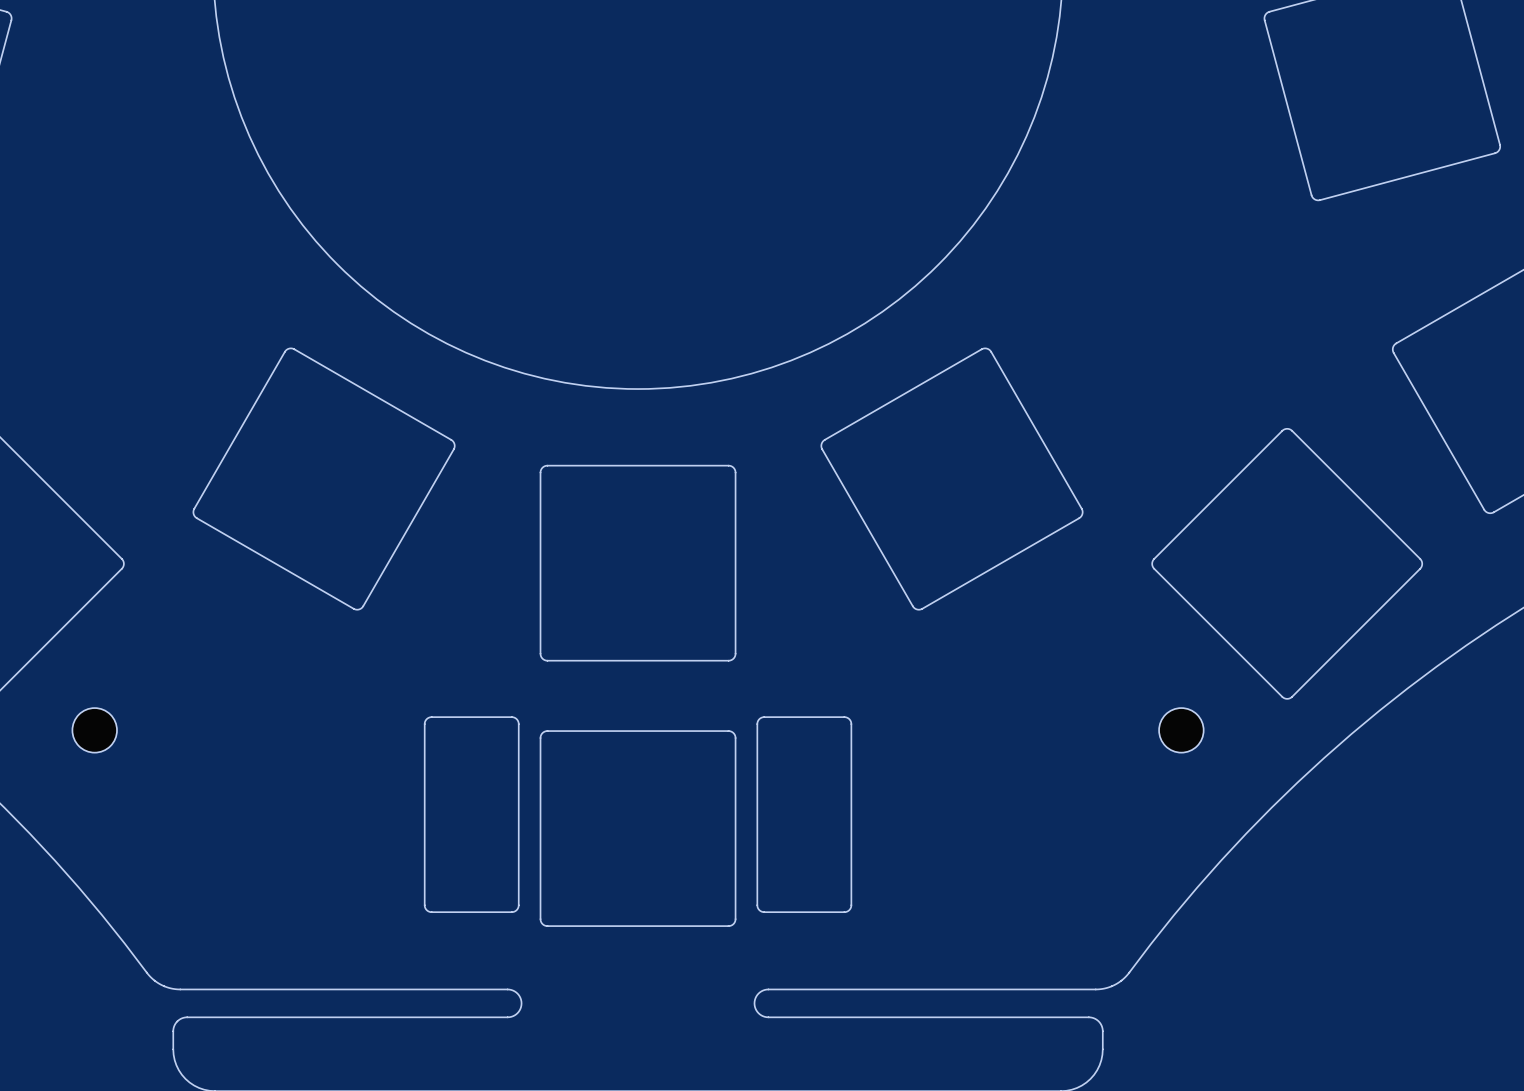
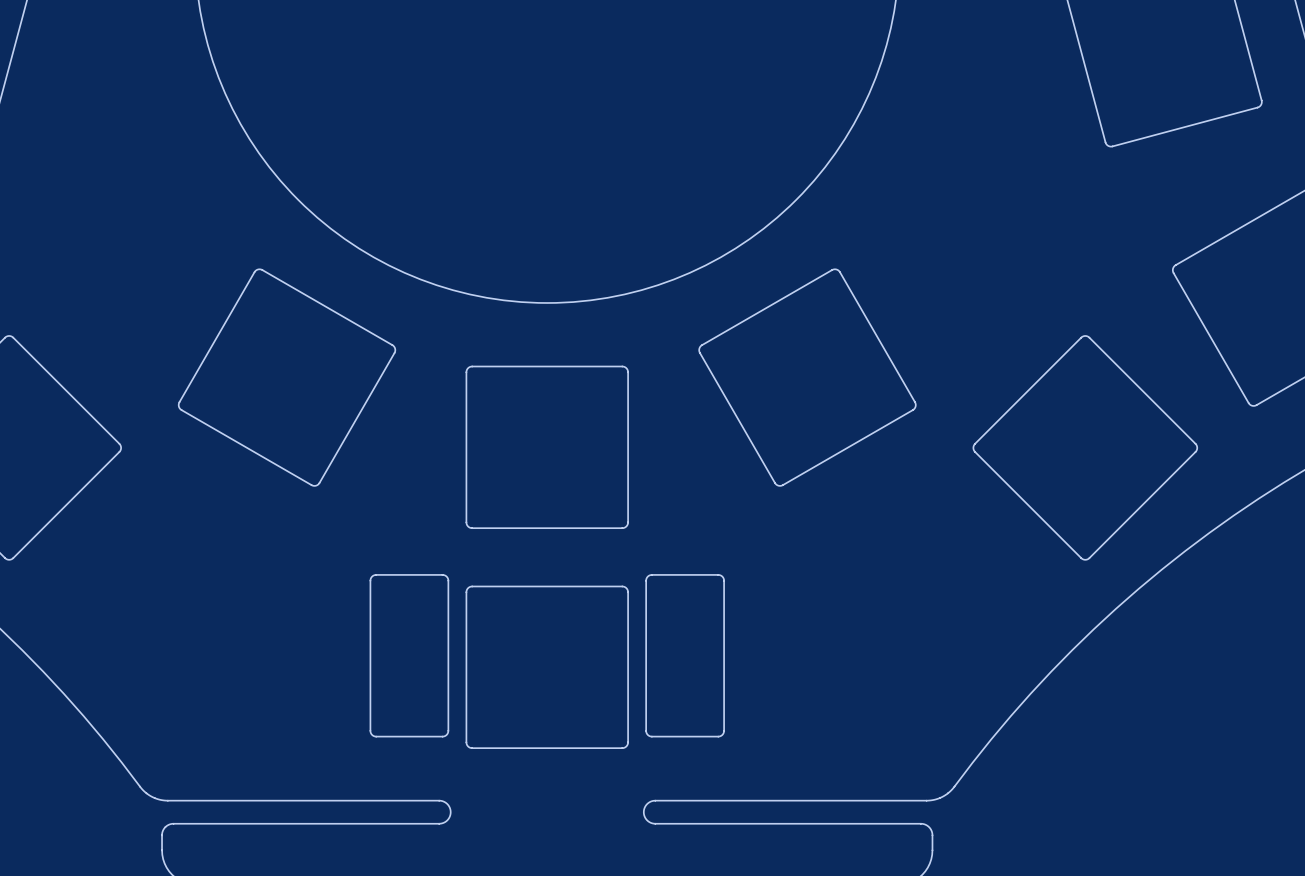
part: (94, 730) -> none
part: (1181, 730) -> none

